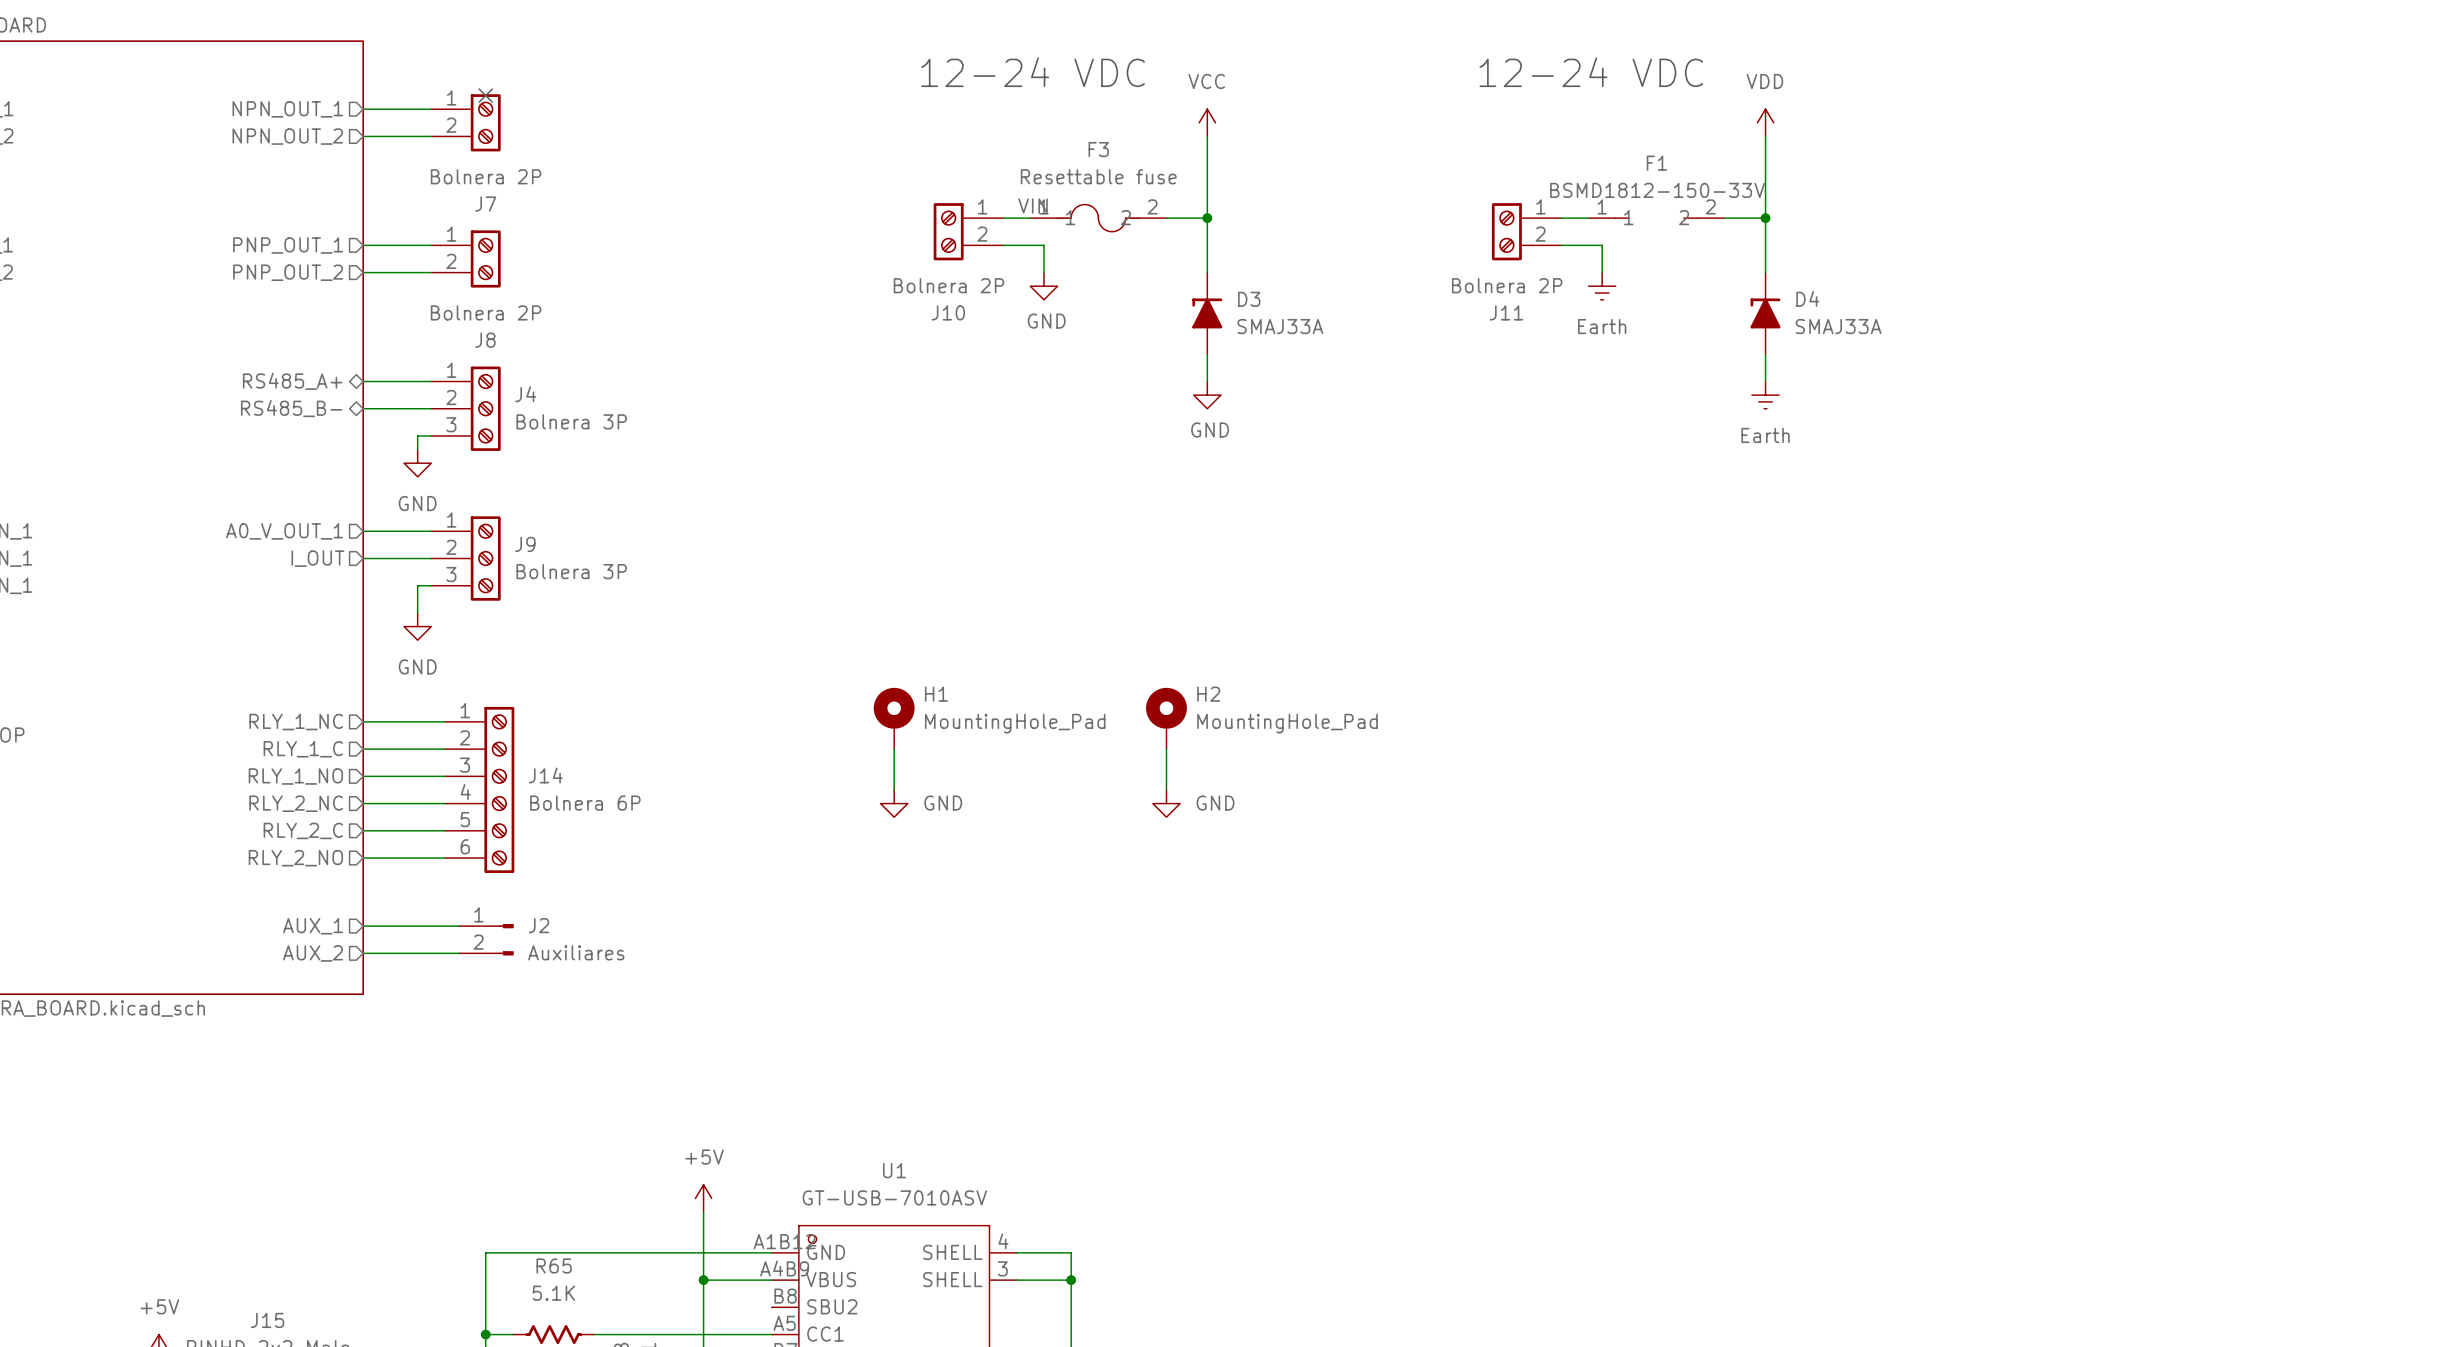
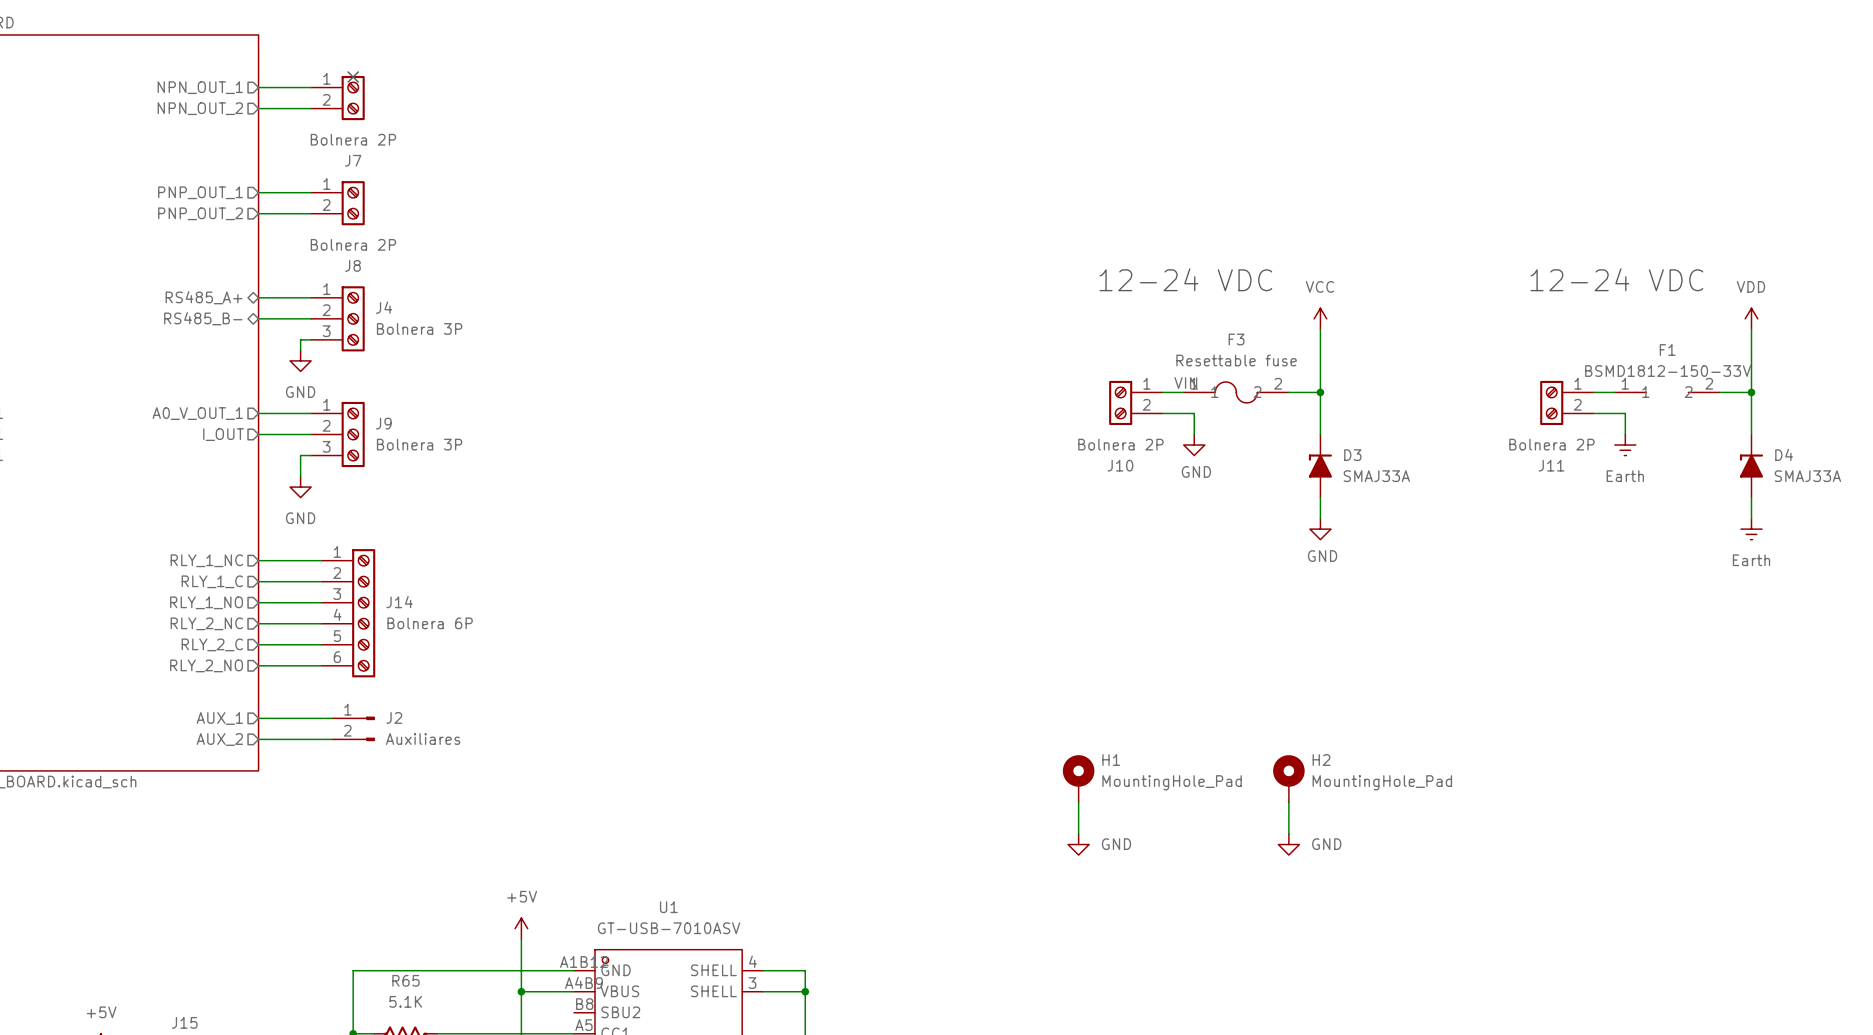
text: 12-24 VDC (1033, 72) -> none
text: 12-24 VDC (1591, 72) -> none
power symbol: VCC (1207, 122) -> none
power symbol: VDD (1765, 122) -> none
wire: (1207, 136) (1207, 272) -> none
wire: (1765, 136) (1765, 272) -> none
label: VIN (1033, 205) -> none
wire: (1003, 218) (1030, 218) -> none
F3 position: (1098, 218) -> (1236, 392)
wire: (1166, 218) (1207, 218) -> none
junction: (1207, 218) -> none
wire: (1561, 218) (1588, 218) -> none
F1 position: (1656, 218) -> (1667, 392)
wire: (1724, 218) (1765, 218) -> none
junction: (1765, 218) -> none
J10 position: (968, 231) -> (1135, 402)
J11 position: (1526, 231) -> (1566, 402)
wire: (1003, 245) (1043, 245) (1043, 272) -> none
wire: (1561, 245) (1602, 245) (1602, 272) -> none
power symbol: GND (1043, 286) -> none
power symbol: Earth (1602, 286) -> none
D3 position: (1207, 313) -> (1320, 466)
D4 position: (1765, 313) -> (1751, 466)
wire: (1207, 354) (1207, 381) -> none
wire: (1765, 354) (1765, 381) -> none
text: none -> 12-24 VDC (1185, 279)
text: none -> 12-24 VDC (1616, 279)
power symbol: GND (1207, 395) -> none
power symbol: Earth (1765, 395) -> none
power symbol: none -> VCC (1320, 318)
power symbol: none -> VDD (1751, 318)
wire: none -> (1320, 329) (1320, 434)
wire: none -> (1751, 329) (1751, 434)
label: none -> VIN (1185, 383)
wire: none -> (1162, 392) (1183, 392)
wire: none -> (1288, 392) (1320, 392)
junction: none -> (1320, 392)
wire: none -> (1593, 392) (1614, 392)
wire: none -> (1719, 392) (1751, 392)
junction: none -> (1751, 392)
wire: none -> (1162, 413) (1194, 413) (1194, 434)
wire: none -> (1593, 413) (1625, 413) (1625, 434)
power symbol: none -> GND (1194, 445)
power symbol: none -> Earth (1625, 445)
wire: none -> (1320, 497) (1320, 518)
wire: none -> (1751, 497) (1751, 518)
power symbol: none -> GND (1320, 529)
power symbol: none -> Earth (1751, 529)
H1 position: (894, 718) -> (1078, 778)
H2 position: (1166, 718) -> (1288, 778)
wire: (894, 749) (894, 789) -> none
wire: (1166, 749) (1166, 789) -> none
power symbol: GND (894, 803) -> none
power symbol: GND (1166, 803) -> none
wire: none -> (1078, 802) (1078, 834)
wire: none -> (1288, 802) (1288, 834)
power symbol: none -> GND (1078, 844)
power symbol: none -> GND (1288, 844)

